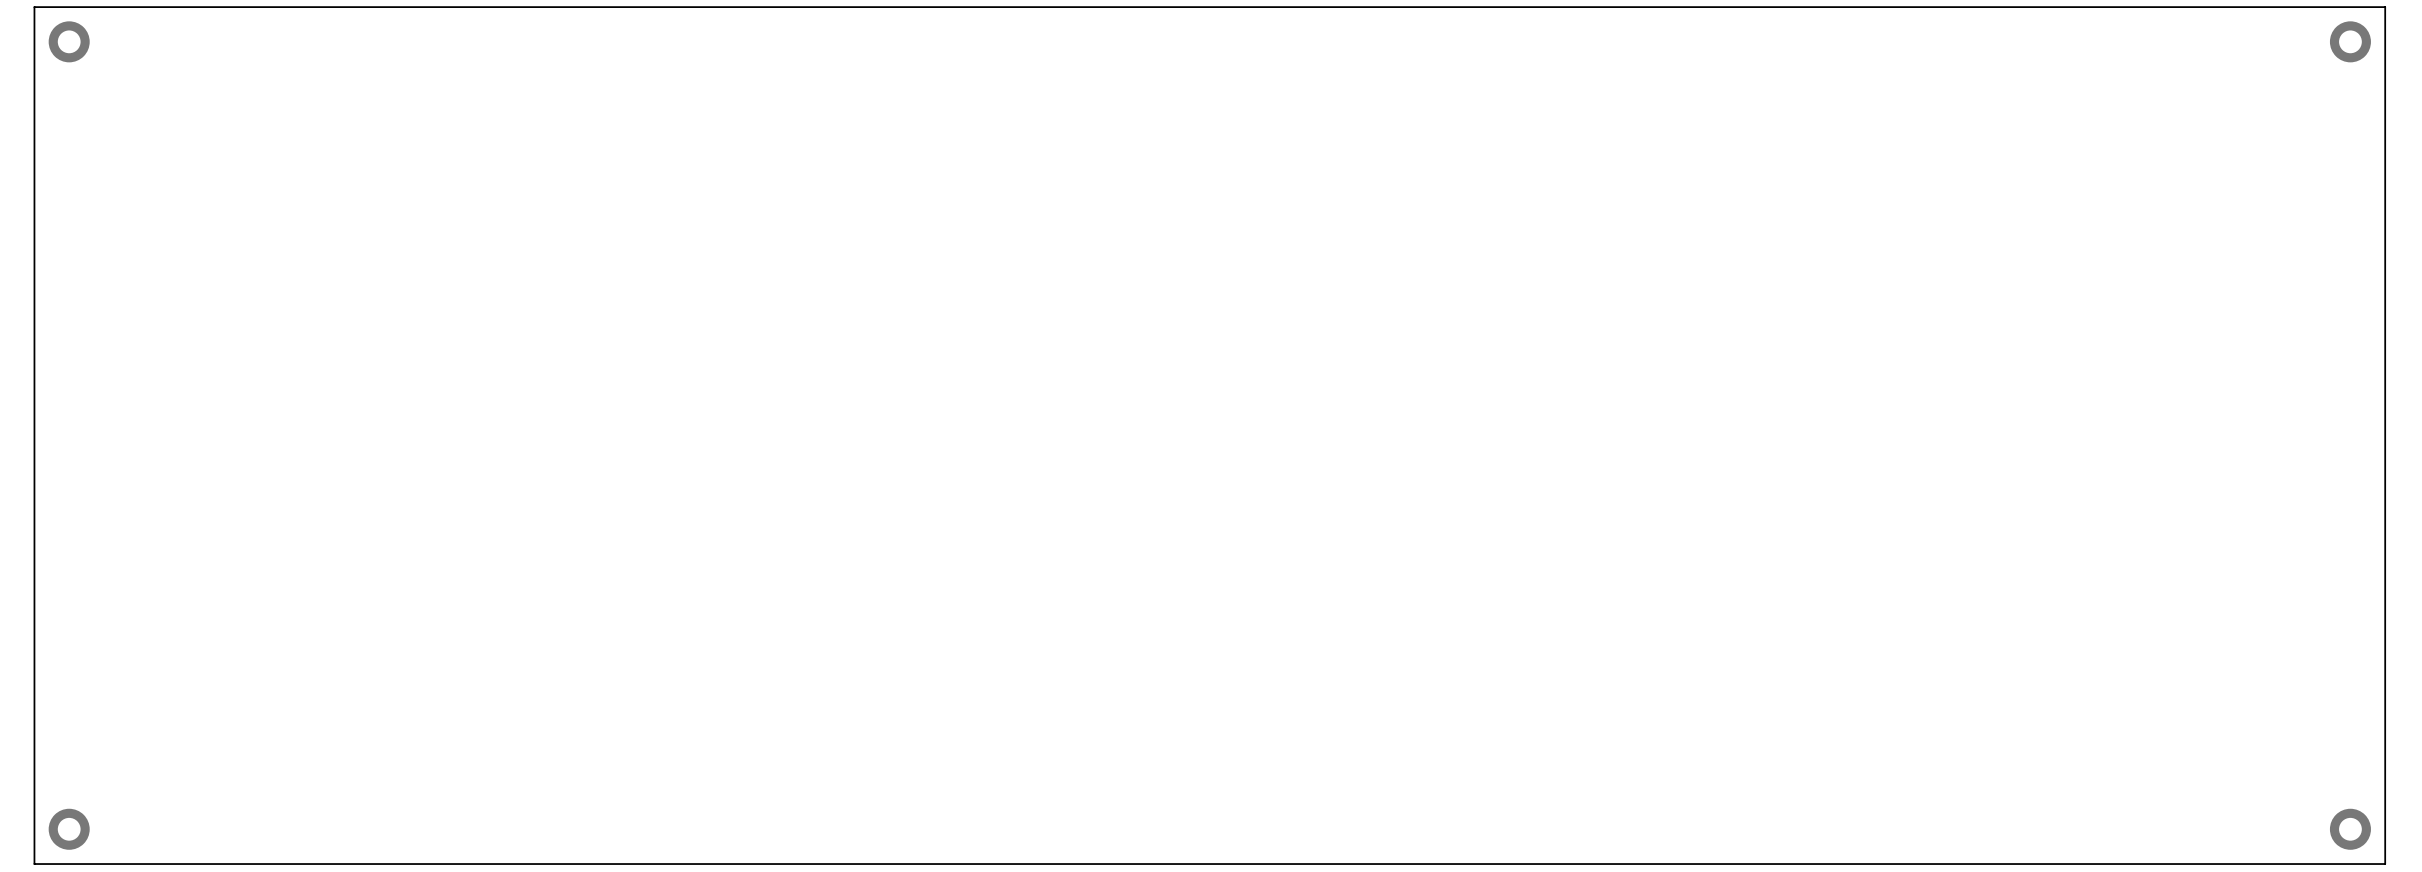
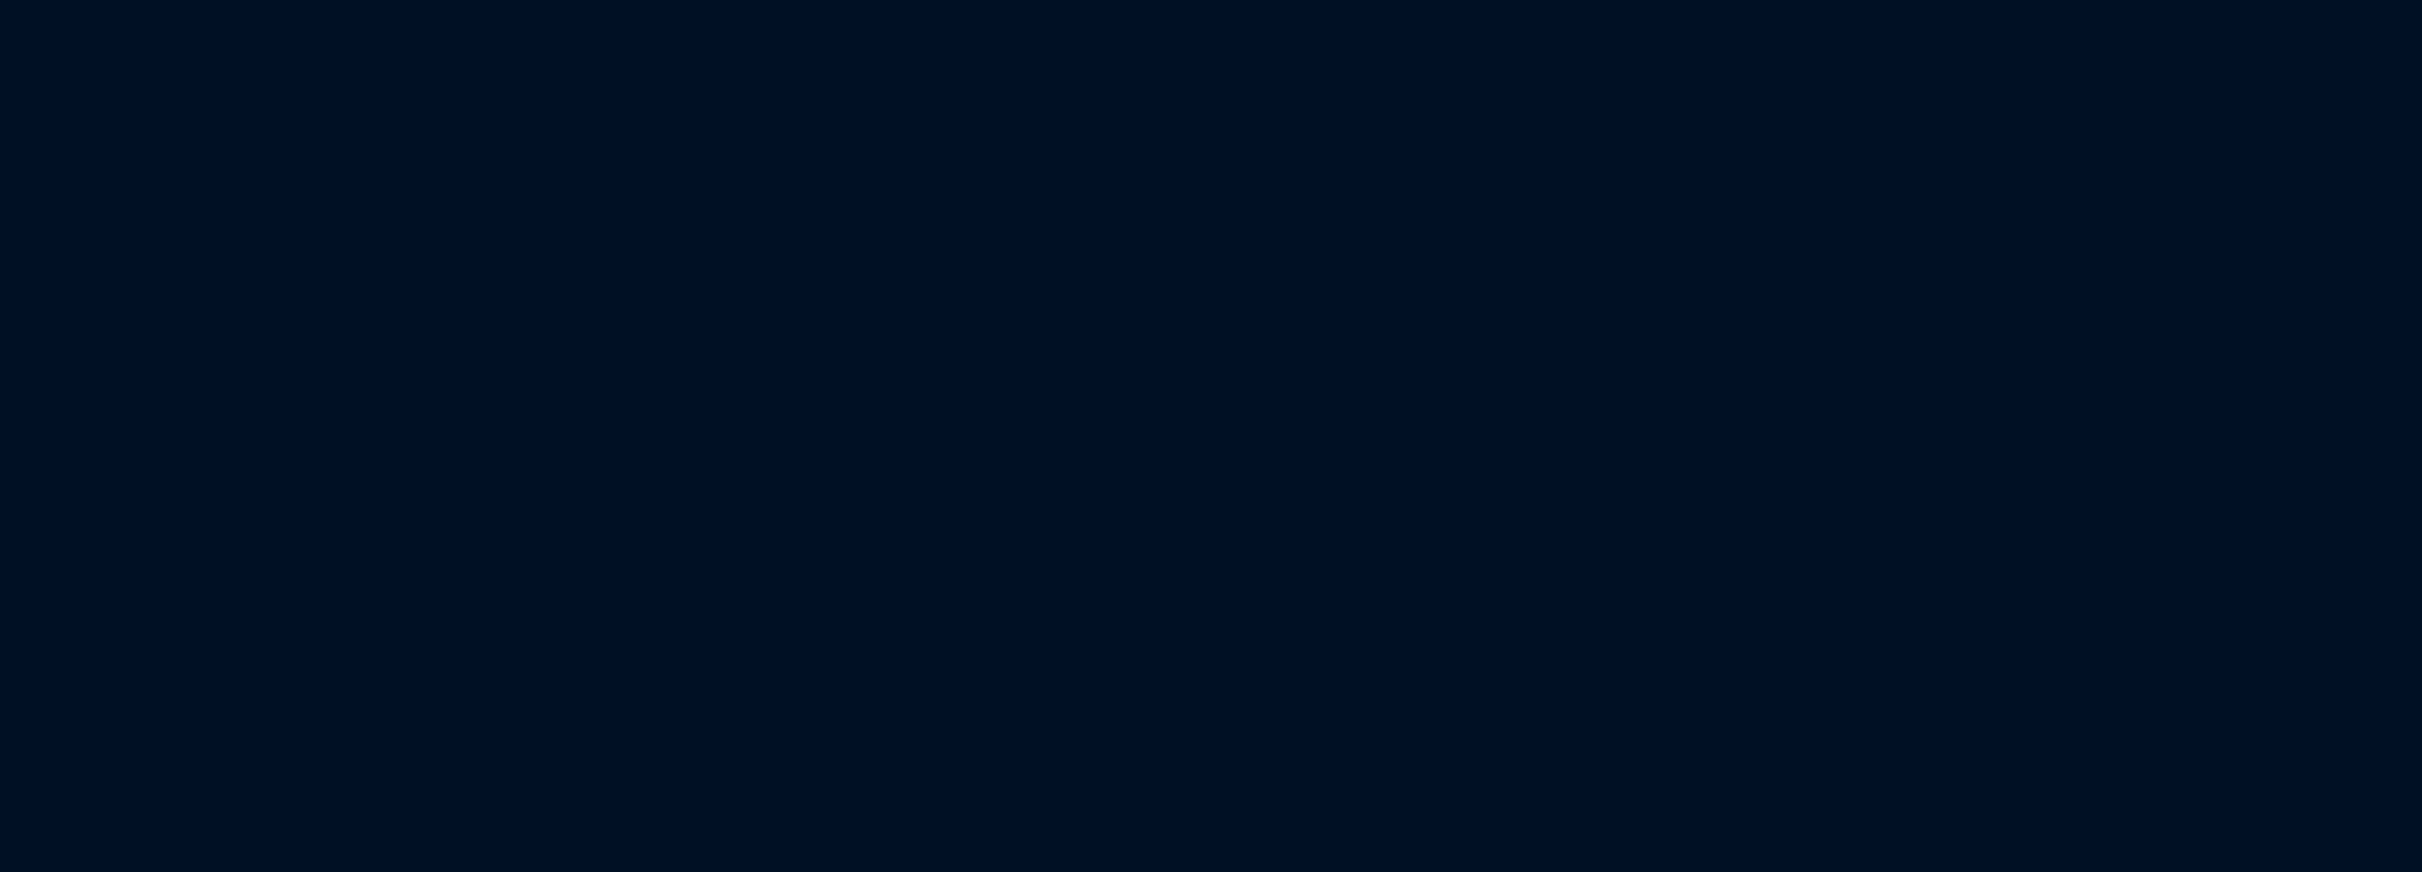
board edge: (2385, 7) (34, 7) (34, 864) (2385, 864) (2385, 7) -> none
via: (69, 41) -> none
via: (2350, 41) -> none
via: (69, 829) -> none
via: (2350, 829) -> none

